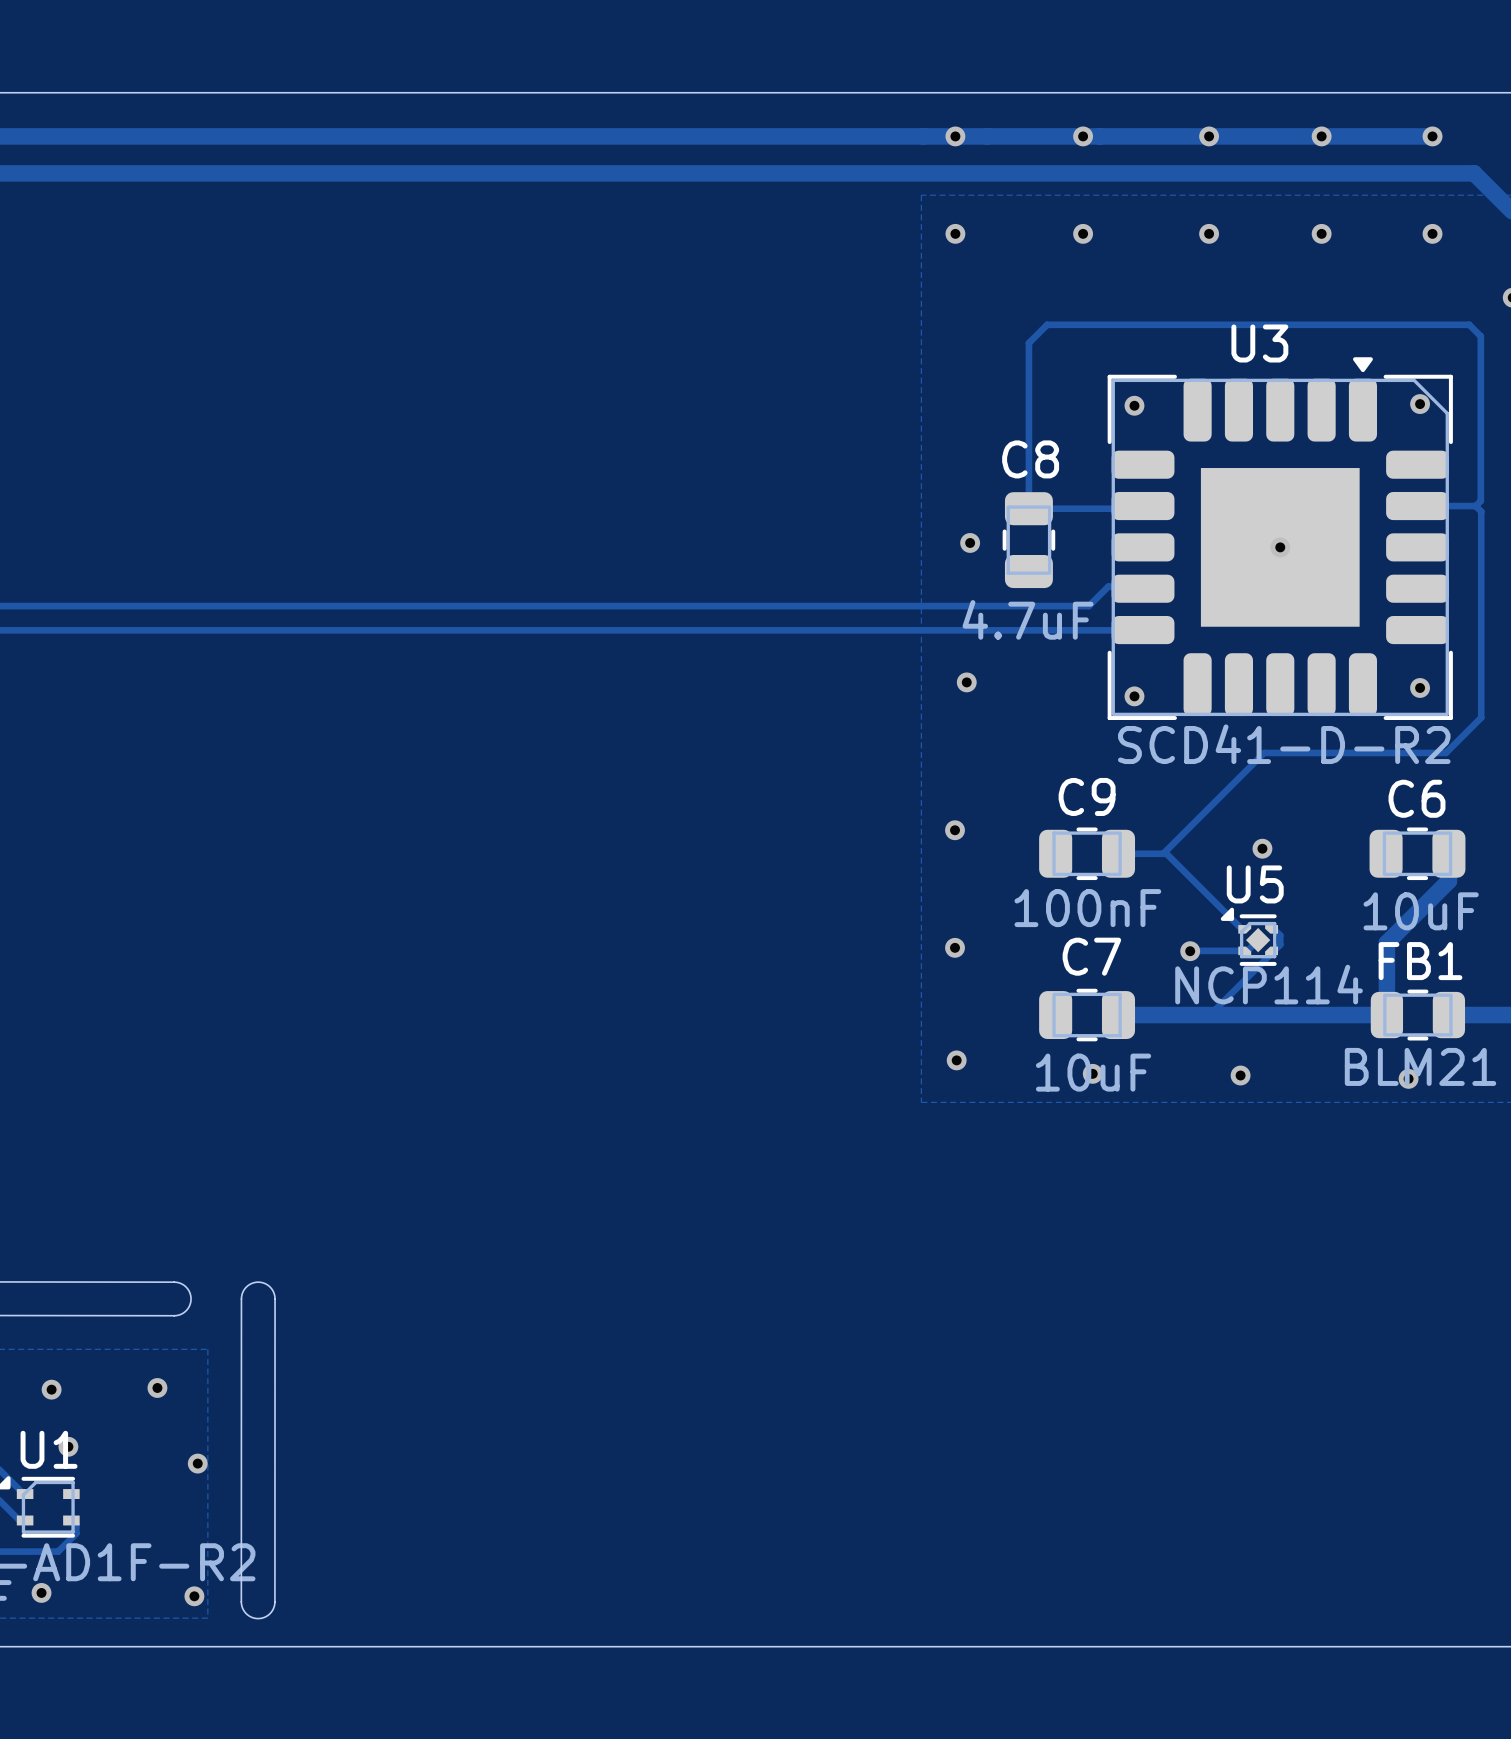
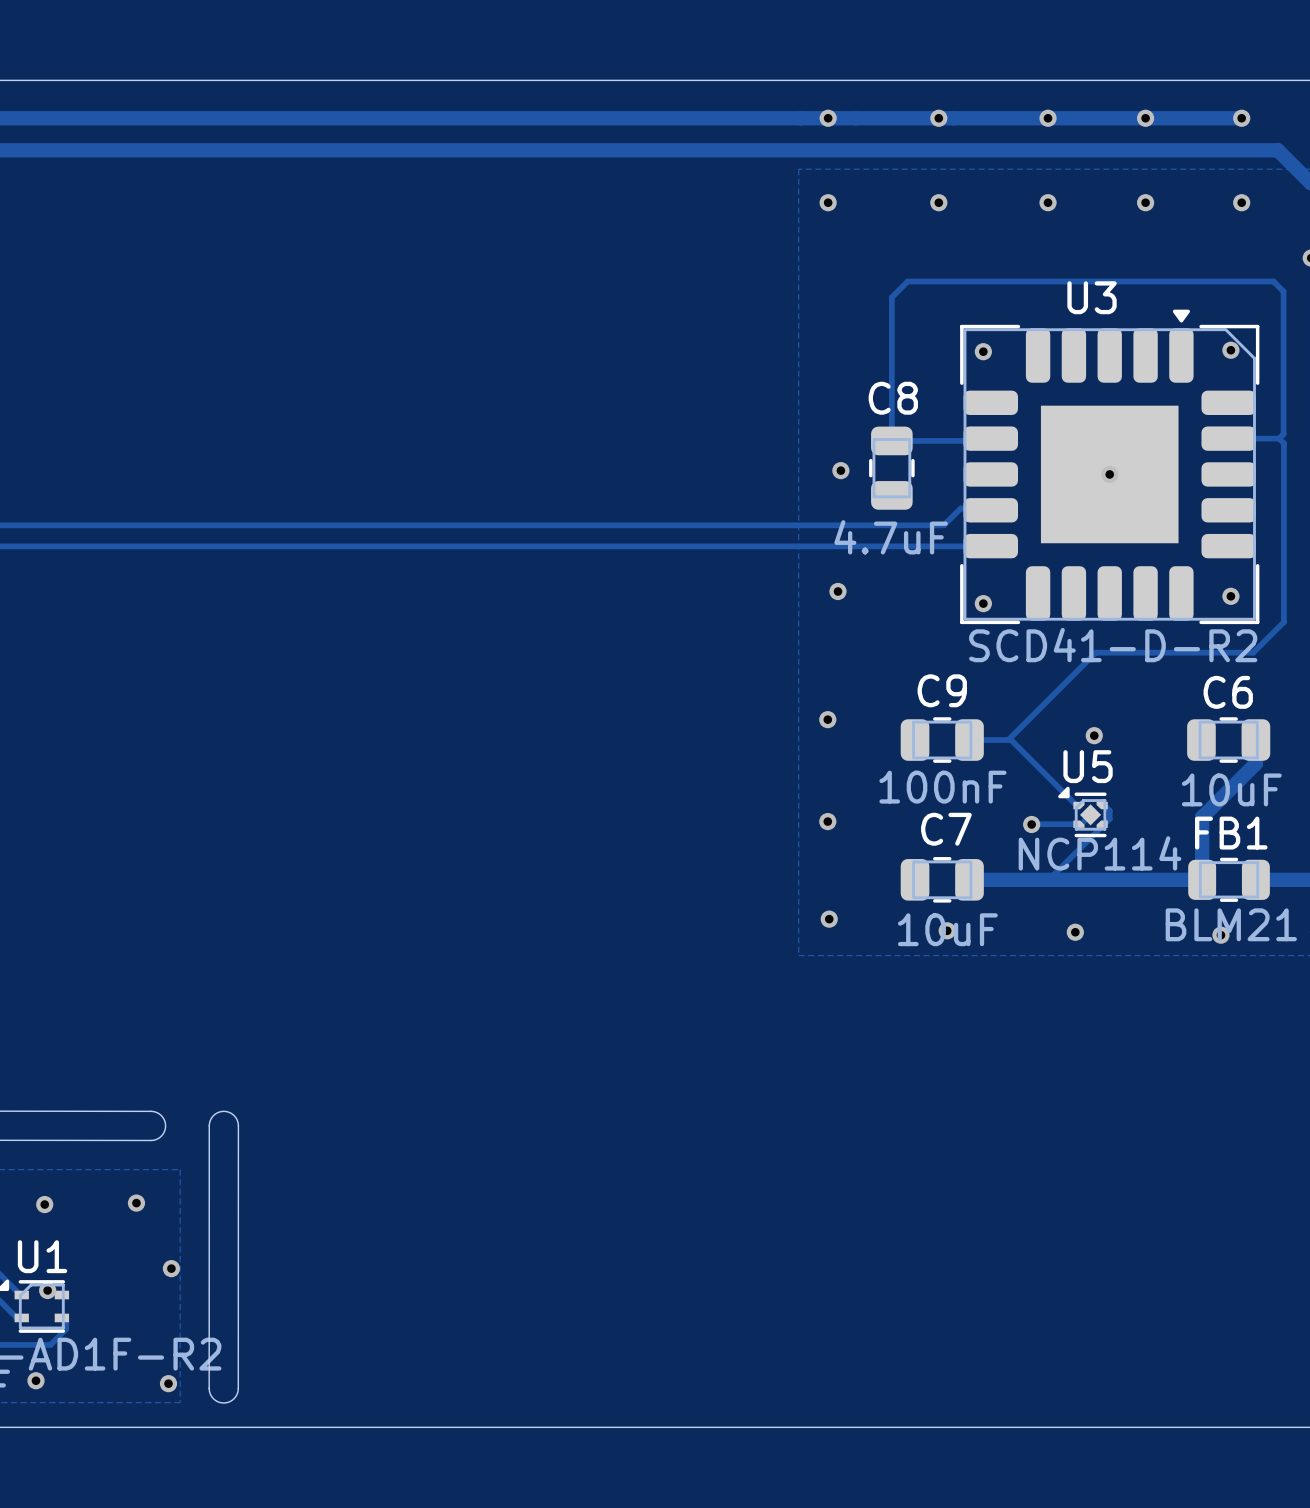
via position: (68, 1446) -> (47, 1290)

